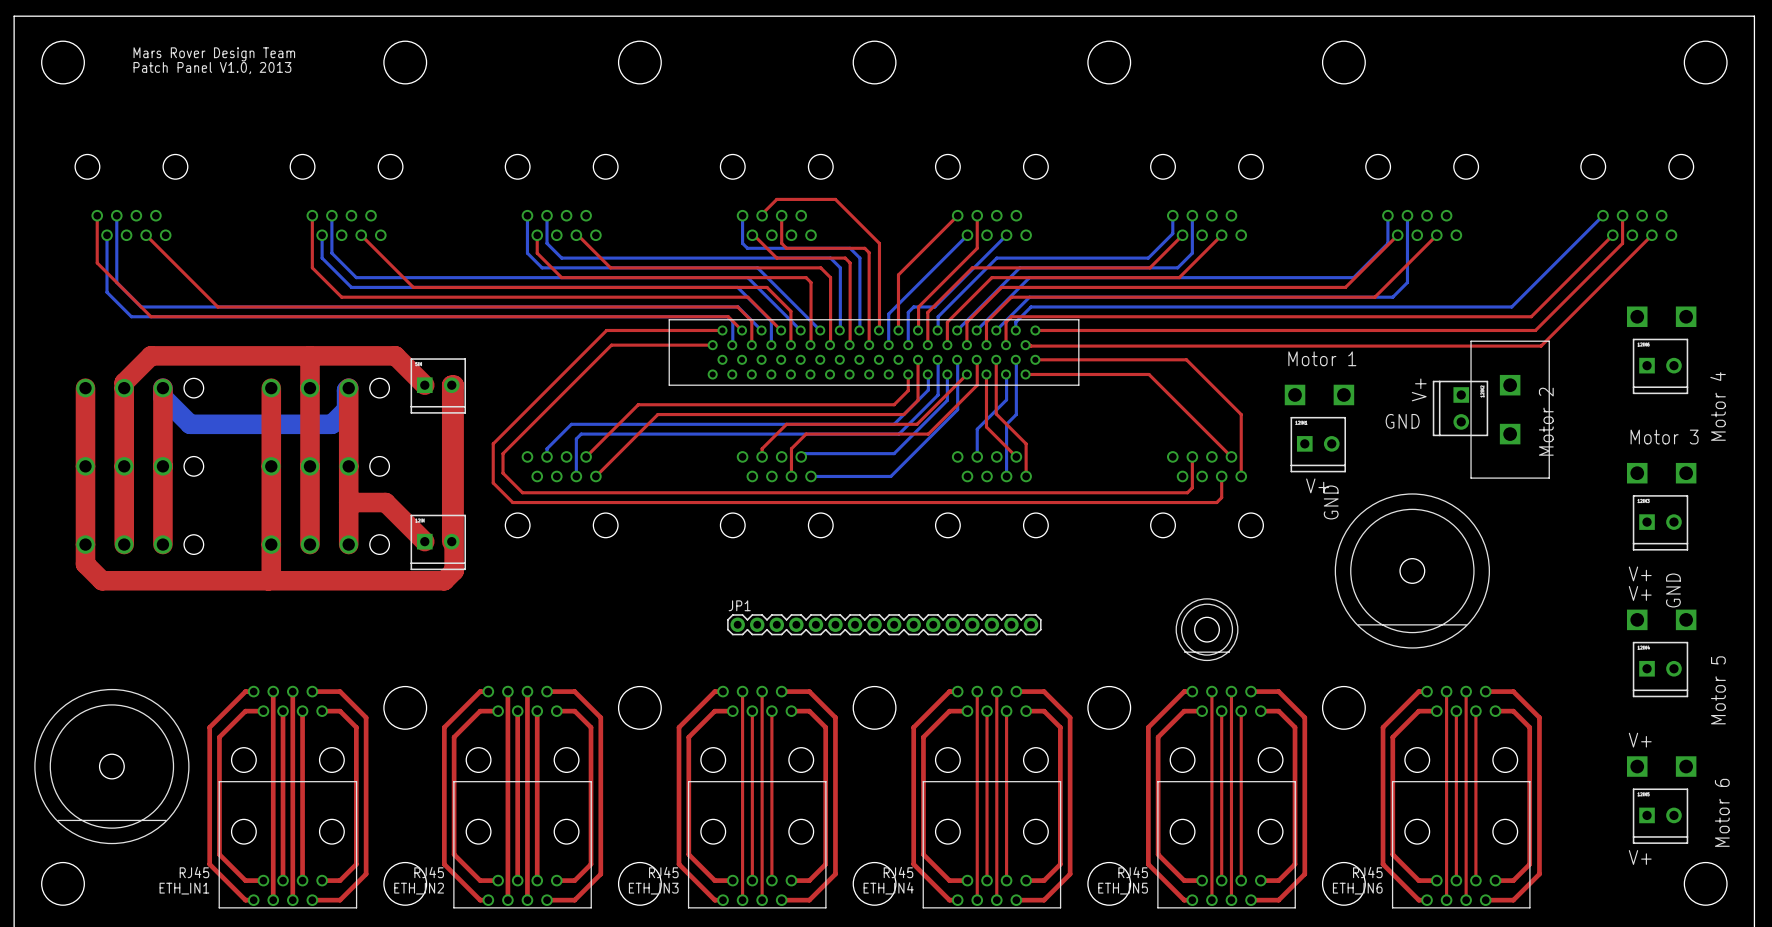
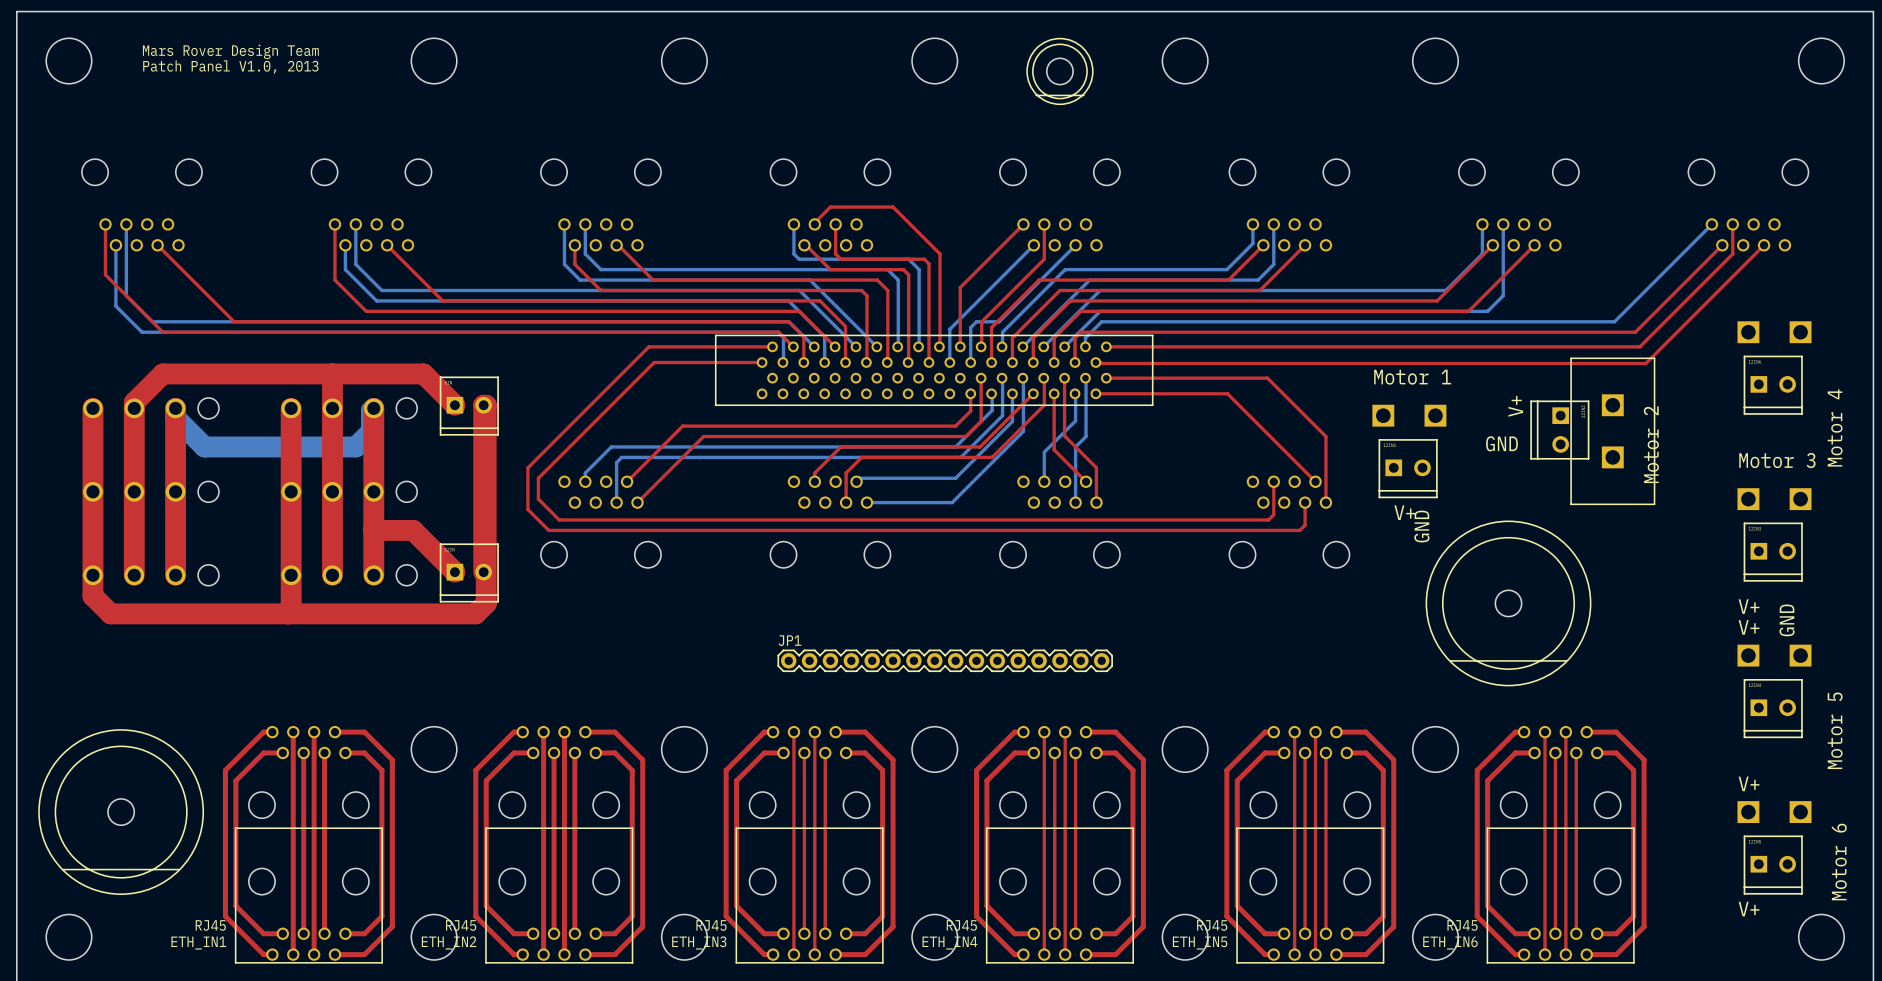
part: none -> (1059, 71)
part: (1207, 629) -> none

